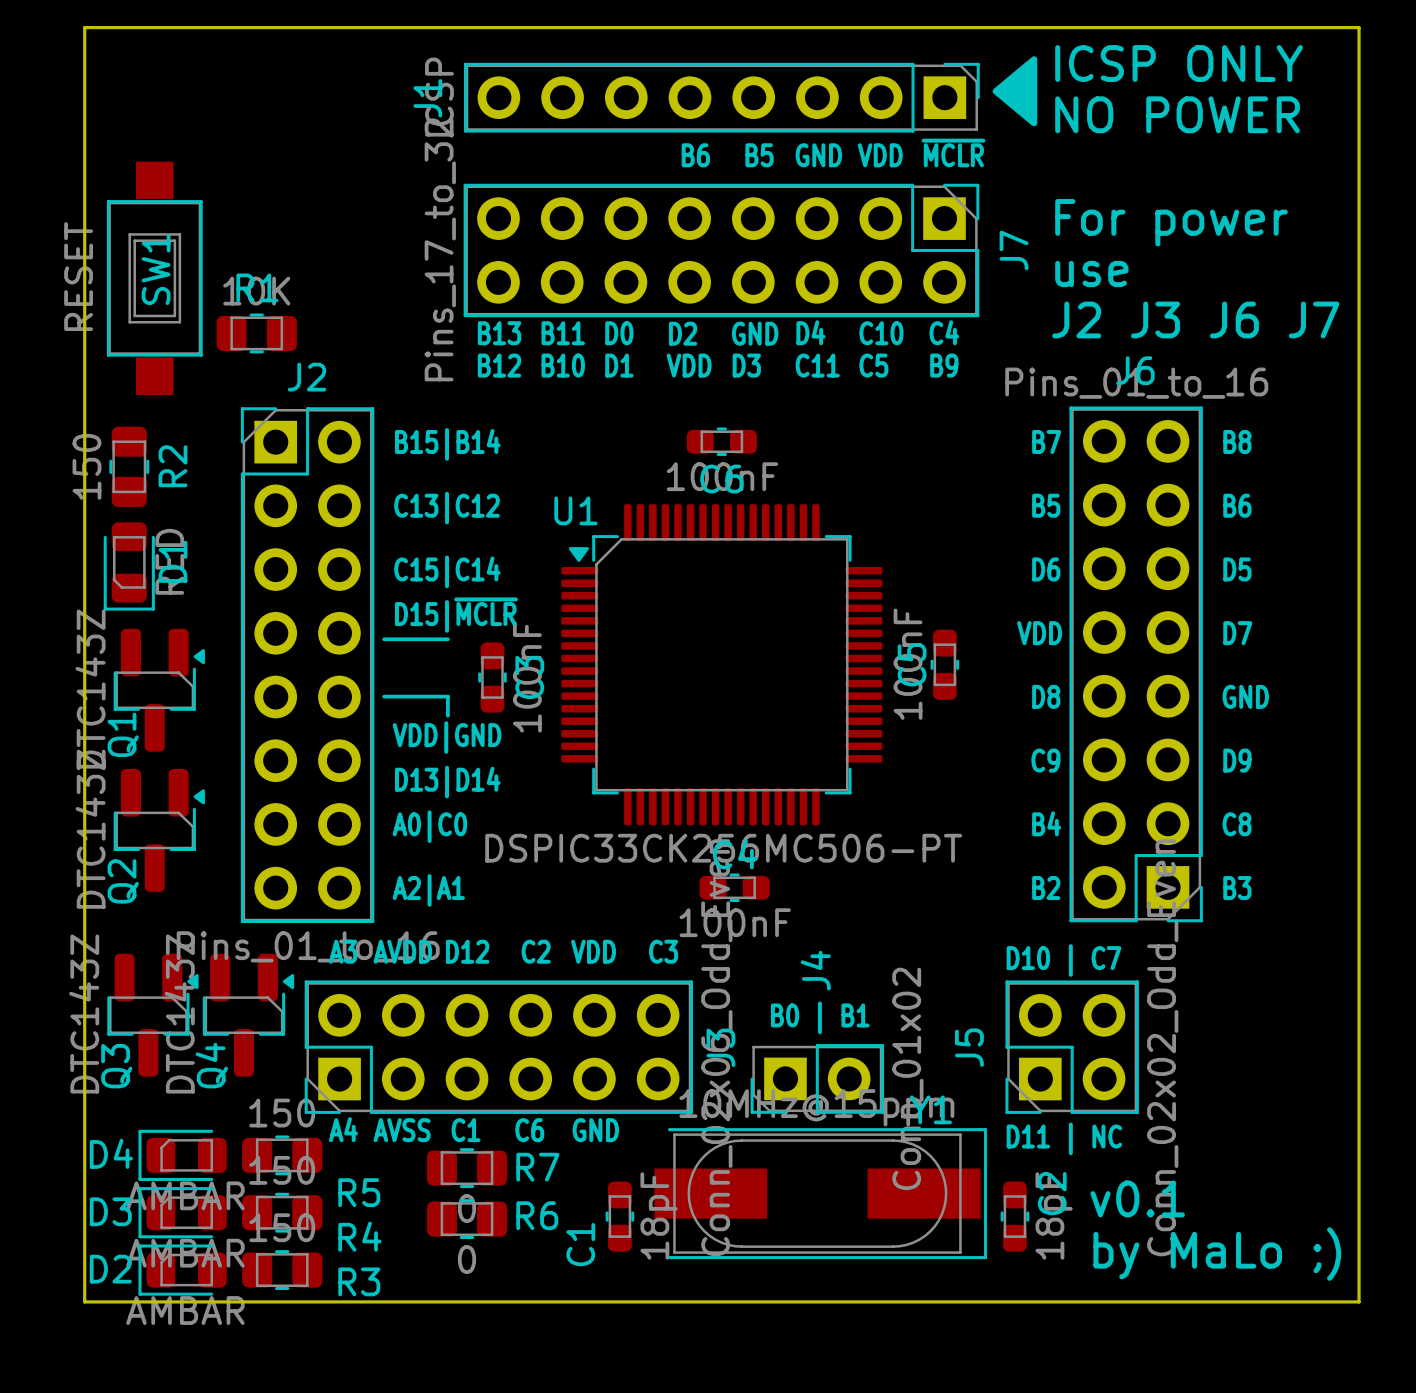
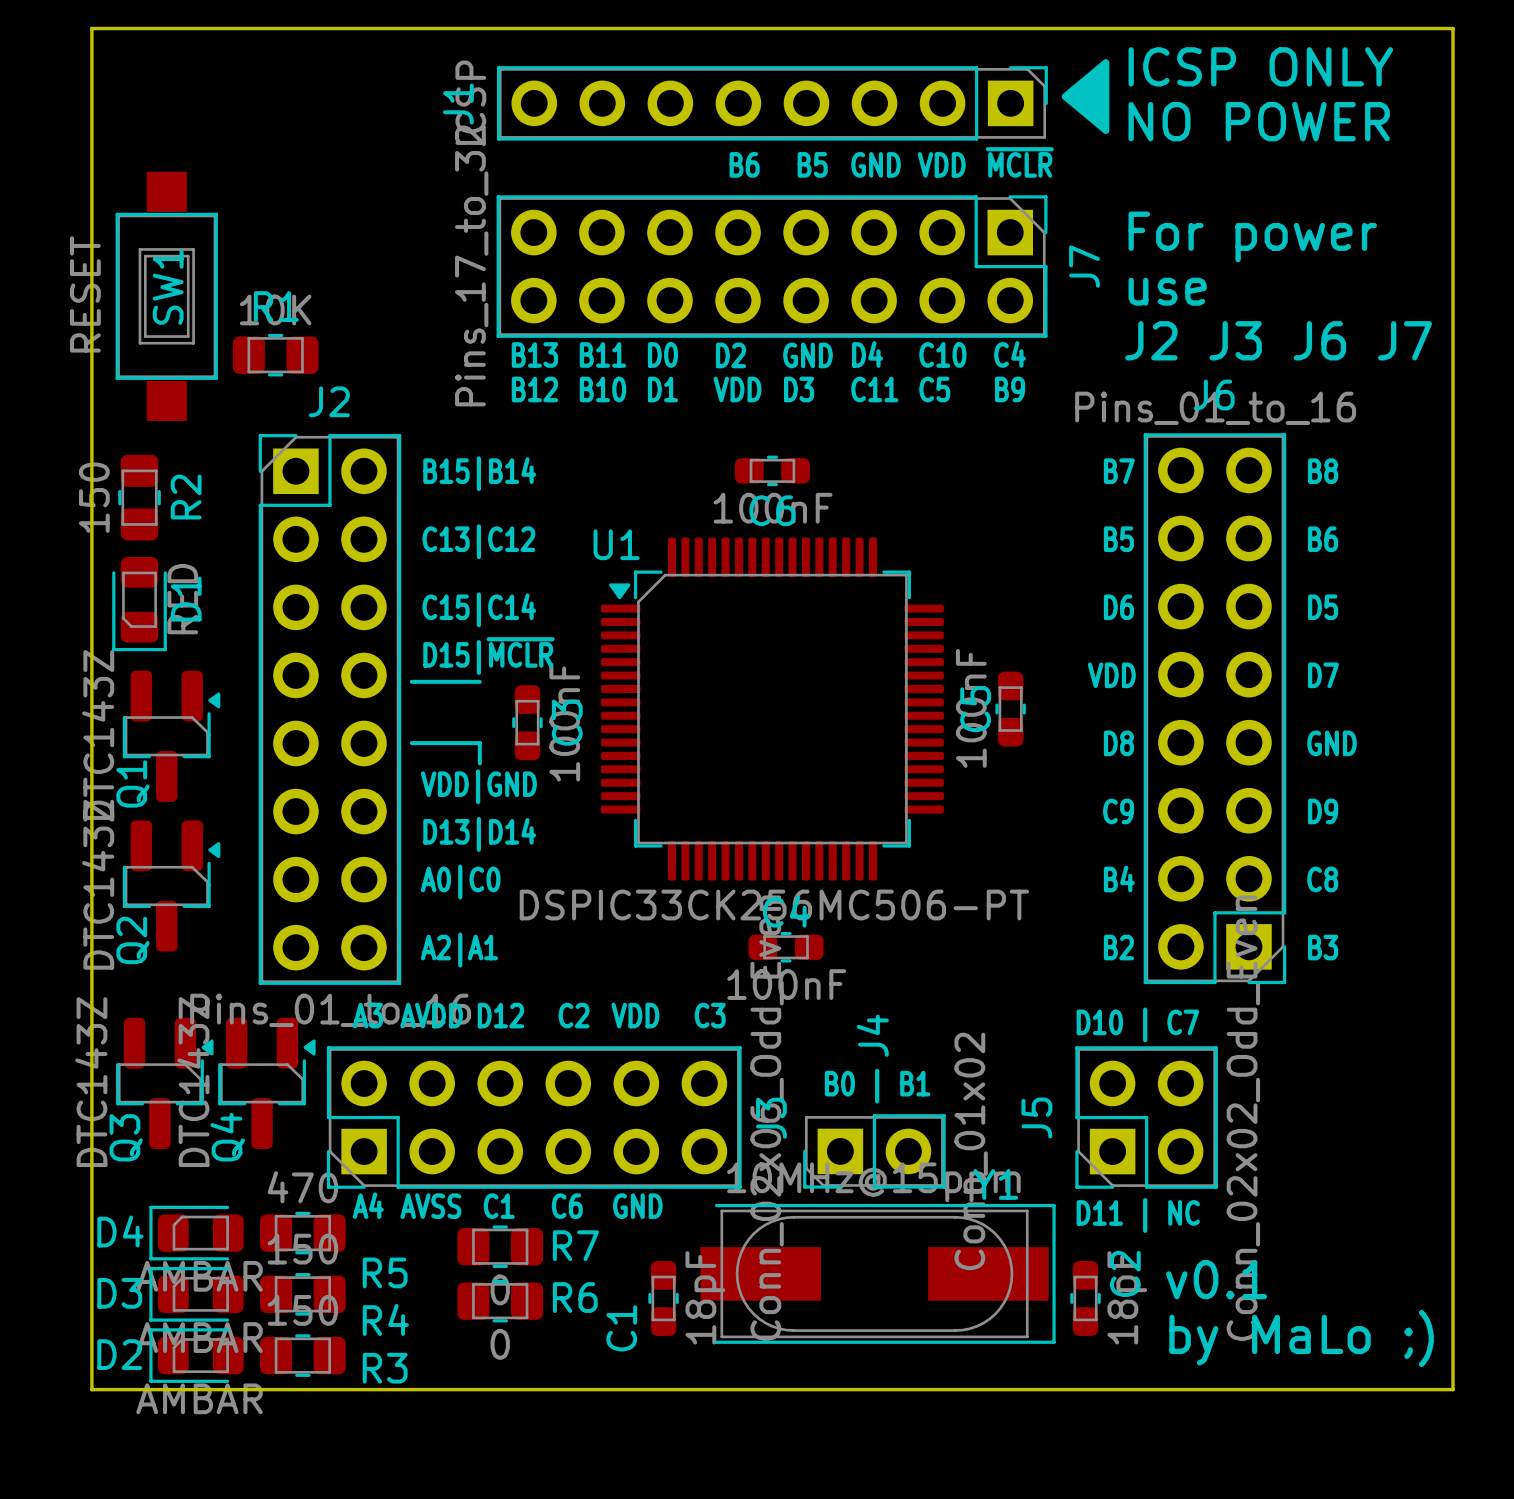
R5 value: 150 (282, 1113) -> 470 (302, 1187)

